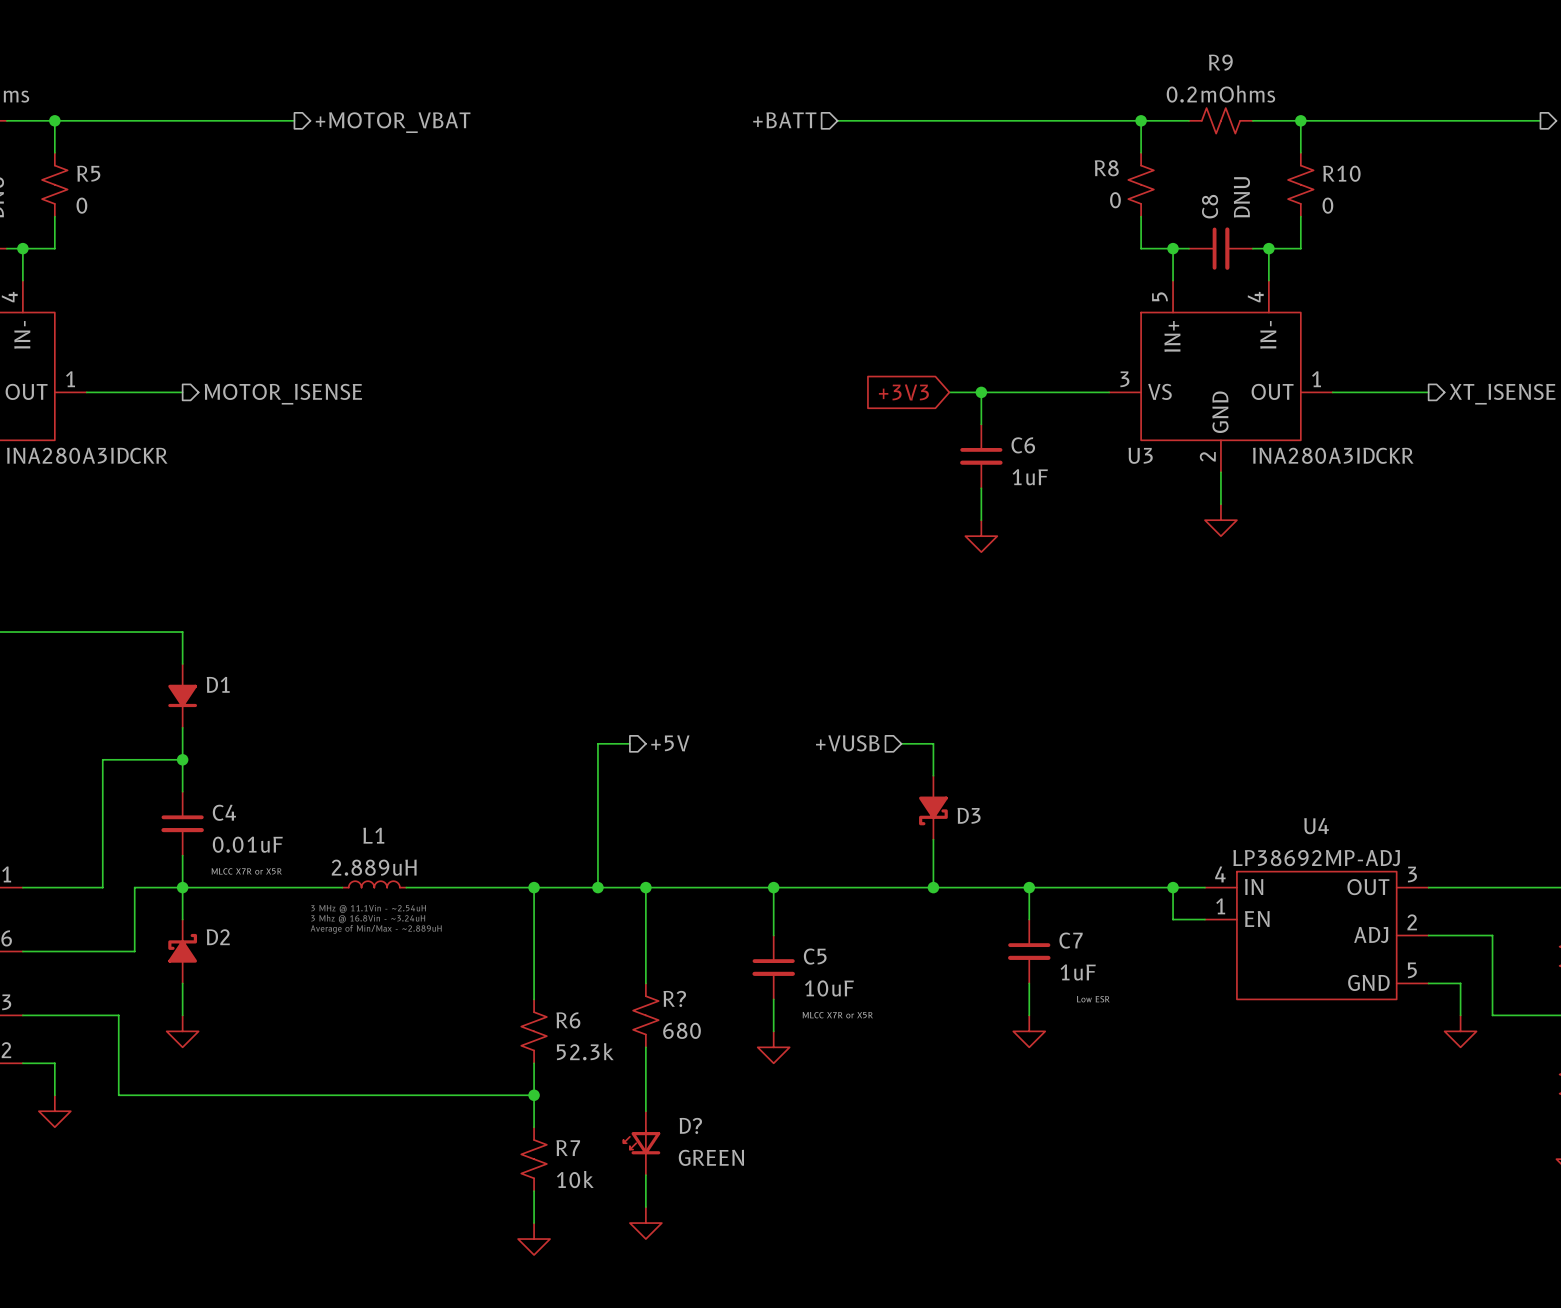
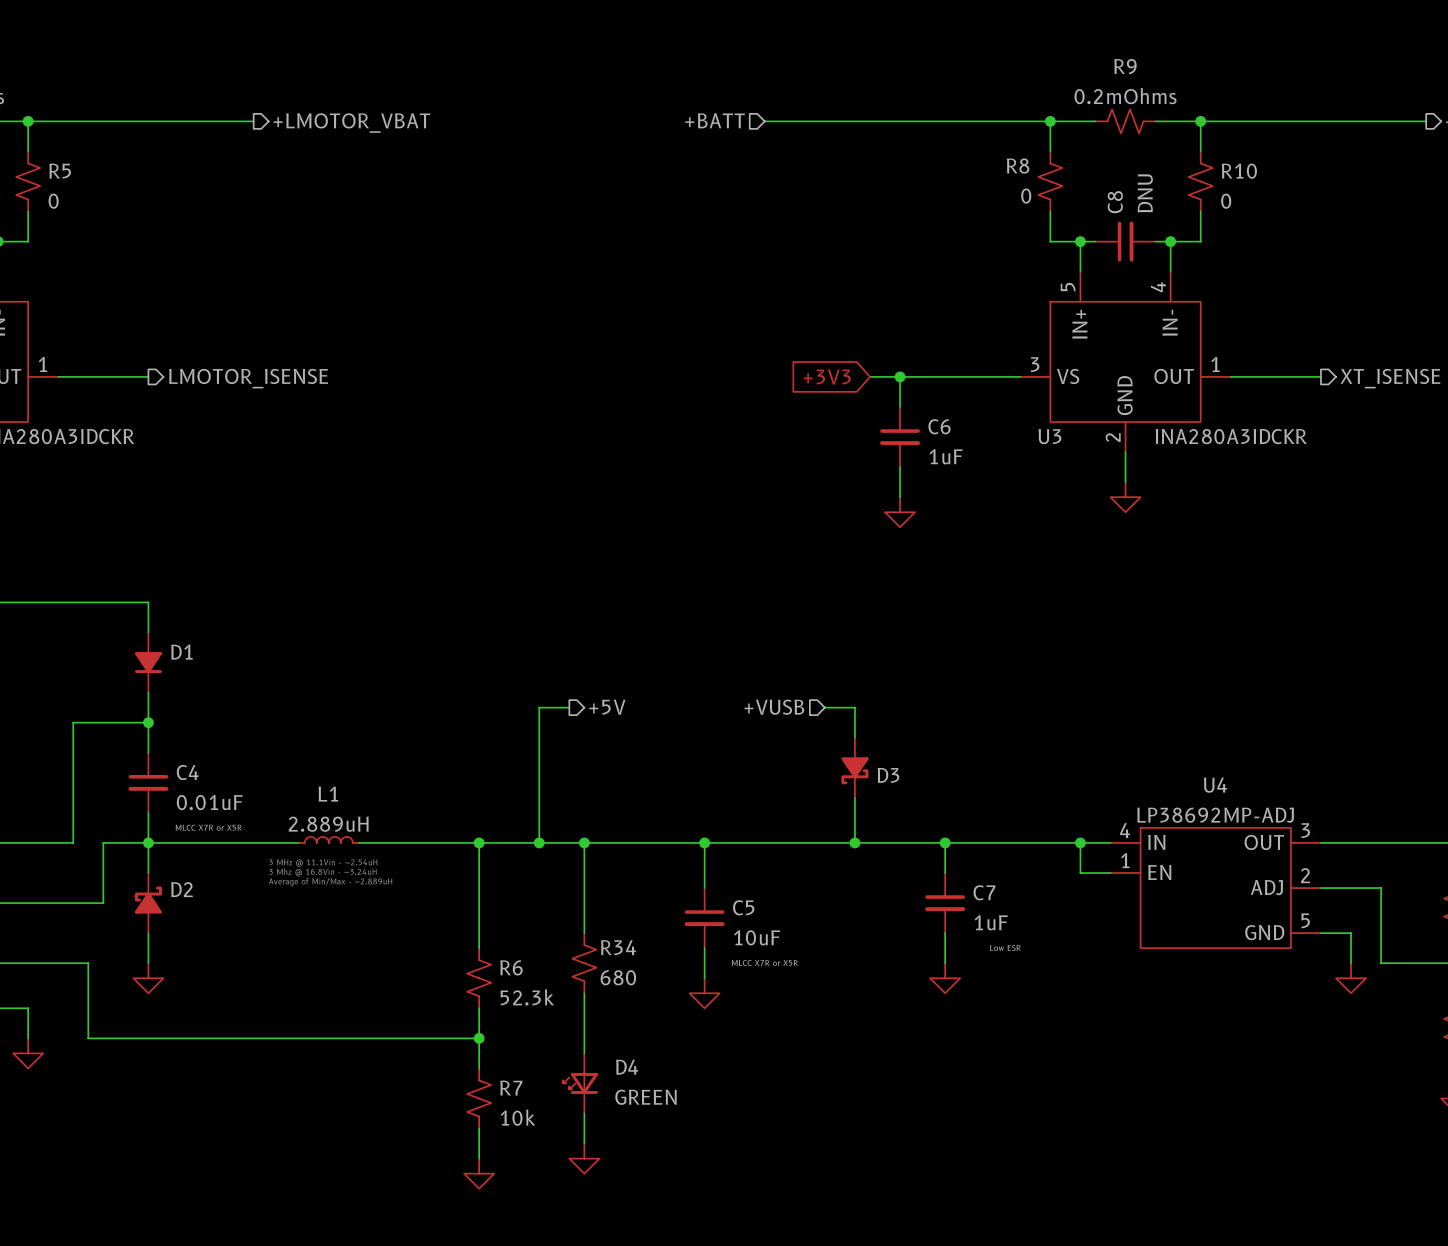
hierarchical label: +MOTOR_VBAT (393, 122) -> +LMOTOR_VBAT (351, 123)
hierarchical label: MOTOR_ISENSE (283, 394) -> LMOTOR_ISENSE (248, 378)
R? name: R? (674, 998) -> R34 (618, 947)
D? name: D? (690, 1125) -> D4 (627, 1067)

